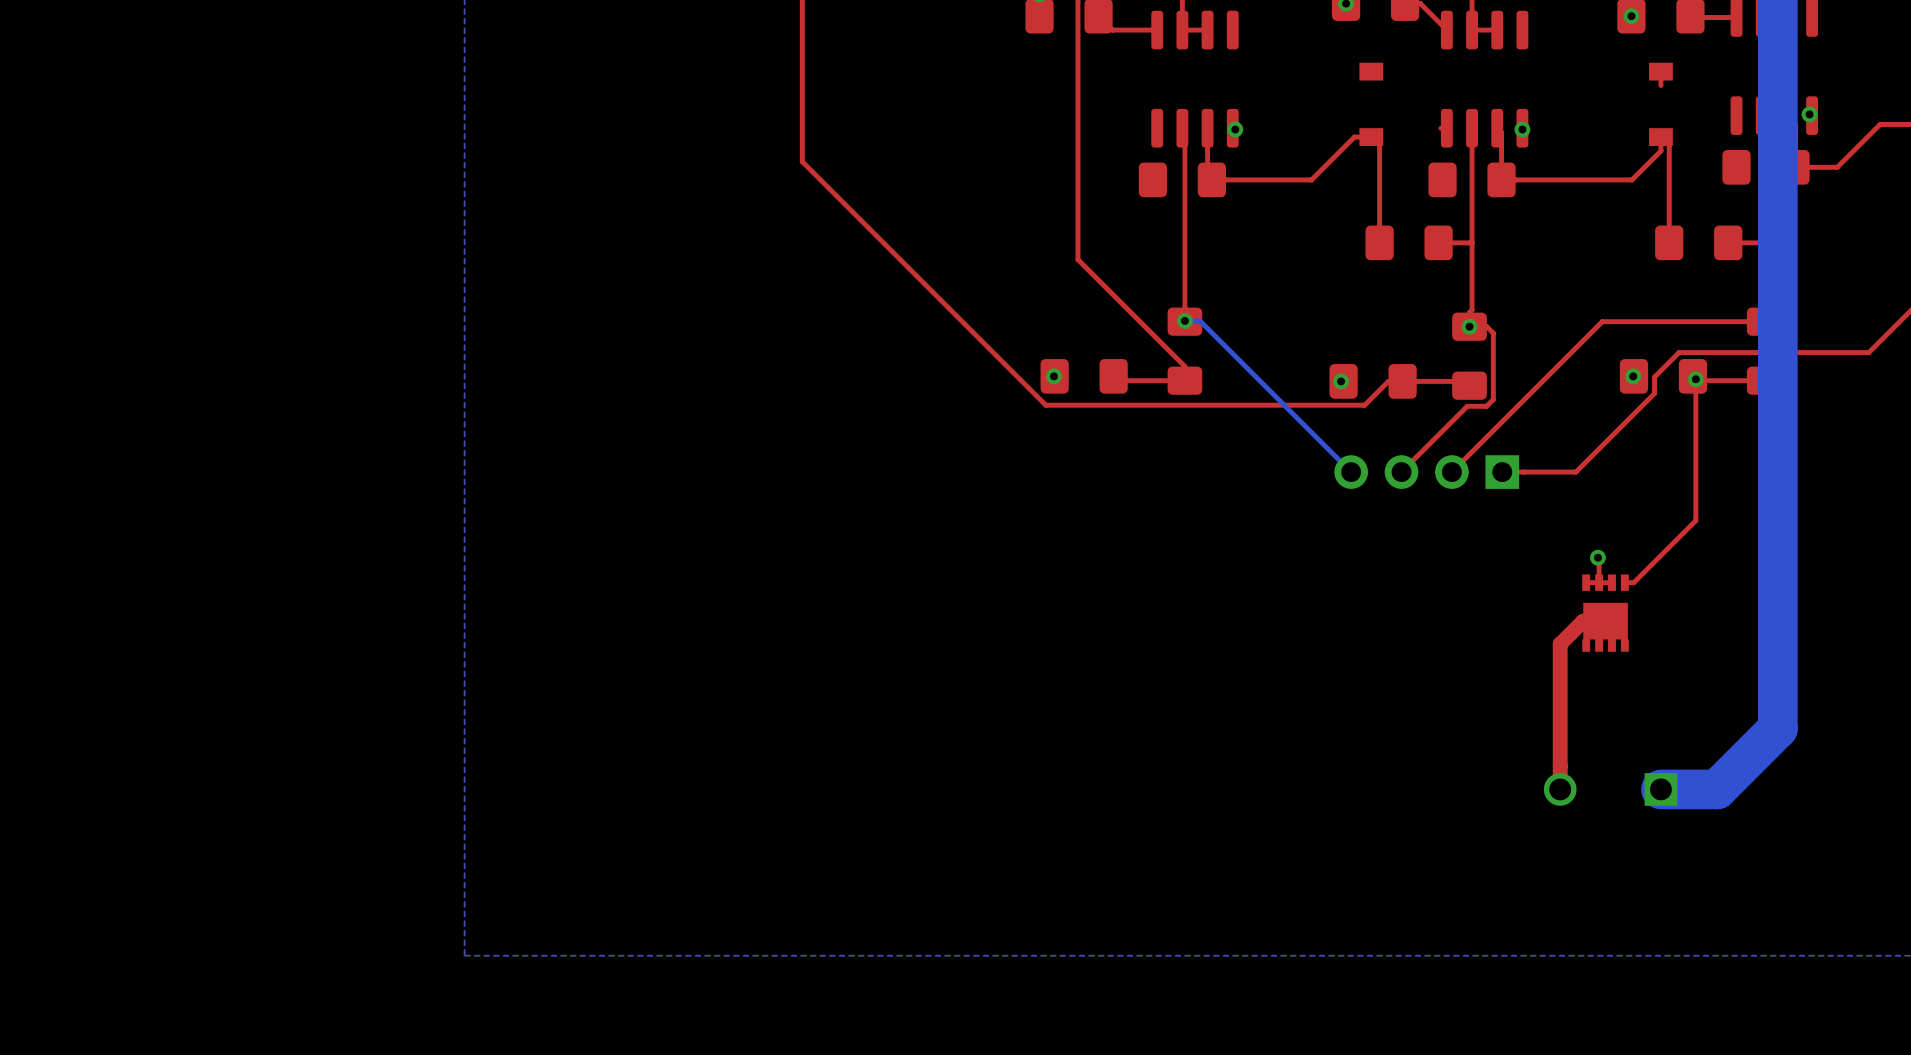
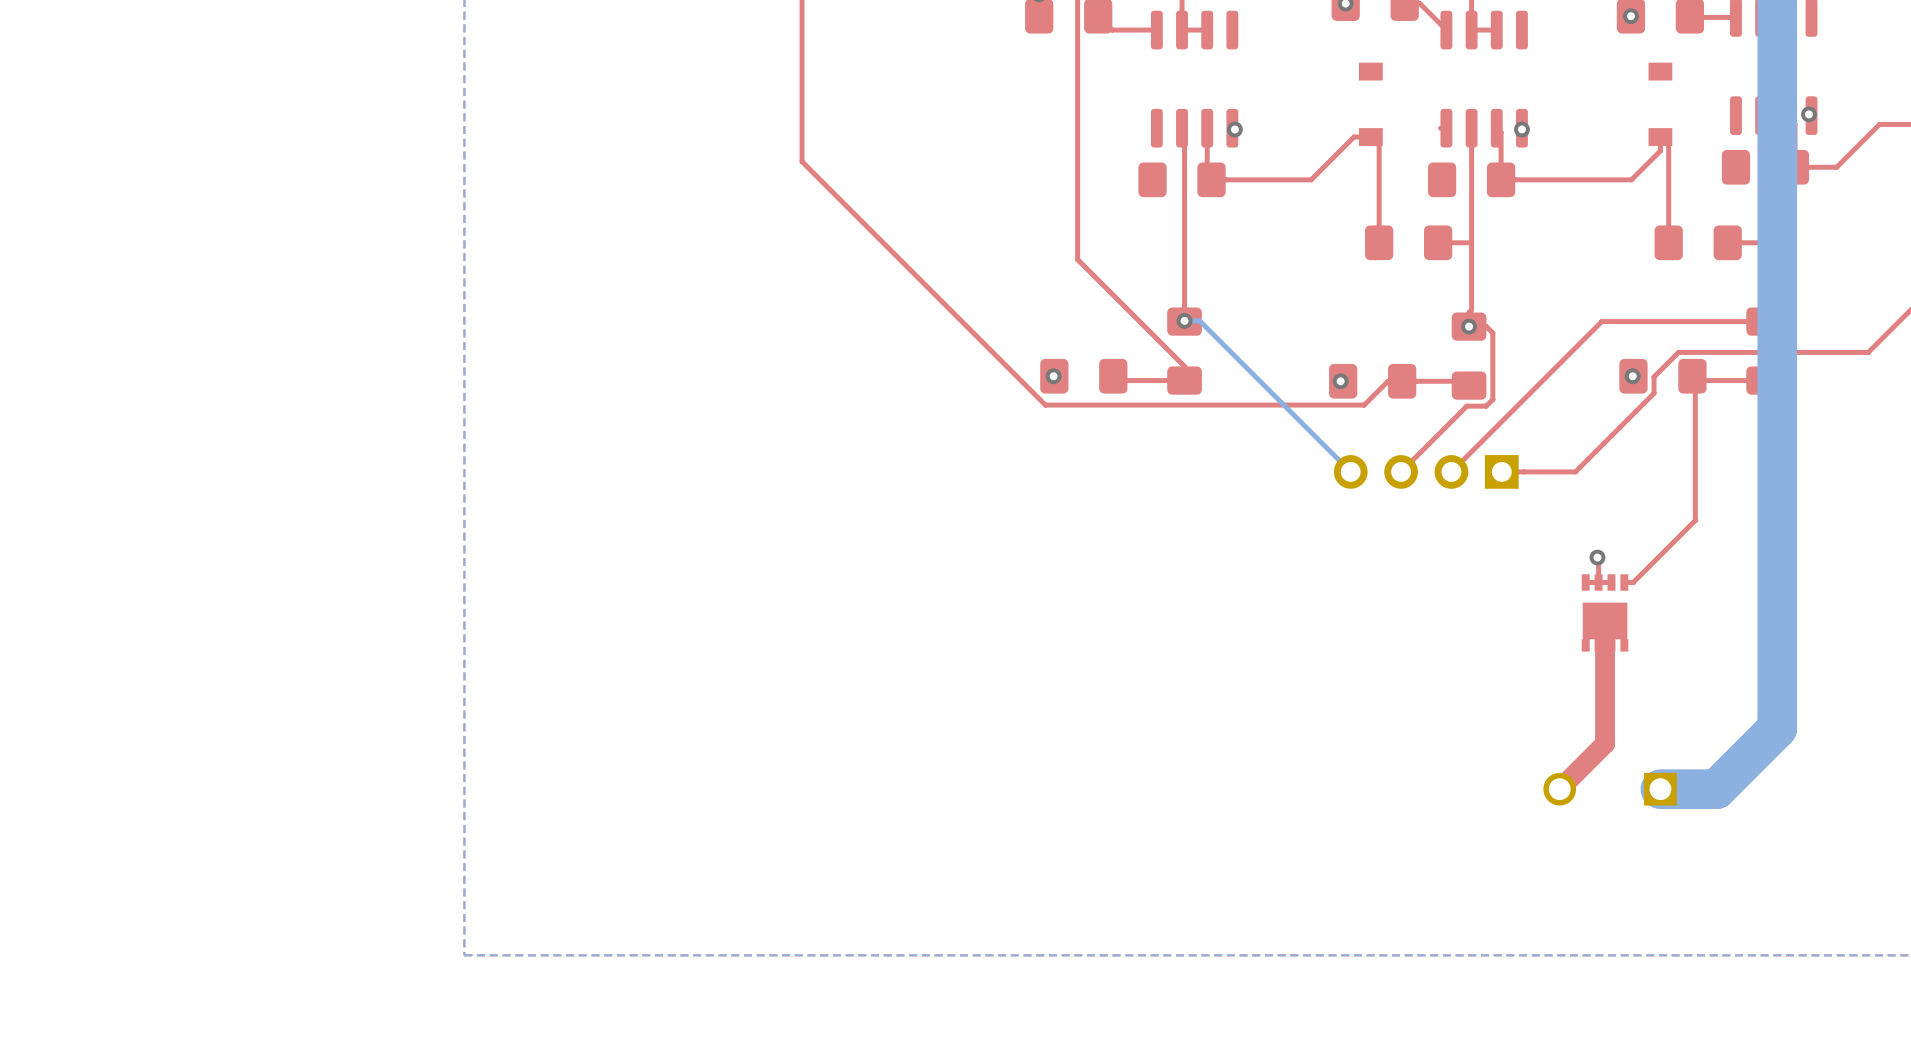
top track: (1660, 71) (1660, 85) -> none
via: (1695, 379) -> none
top track: (1605, 621) (1583, 621) (1560, 644) (1560, 789) -> (1605, 620) (1605, 743) (1559, 789)

